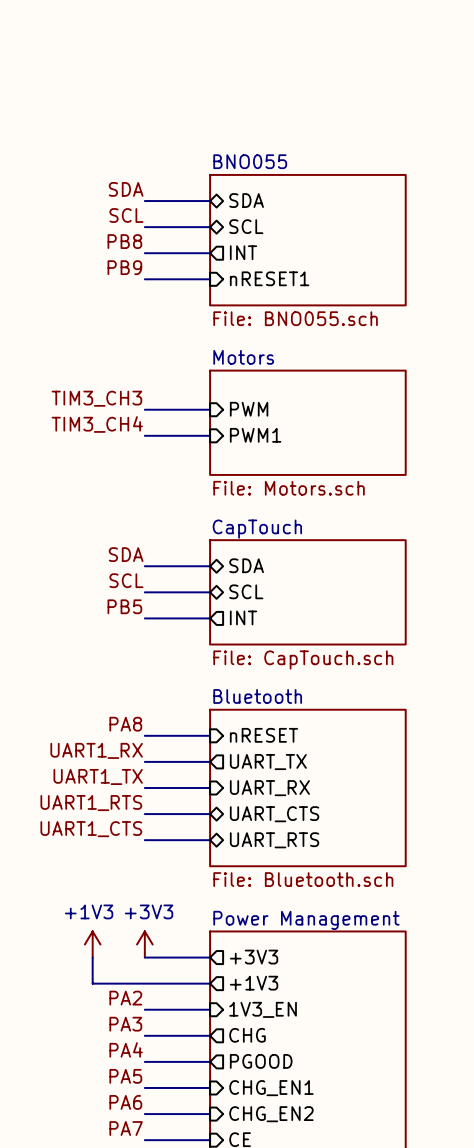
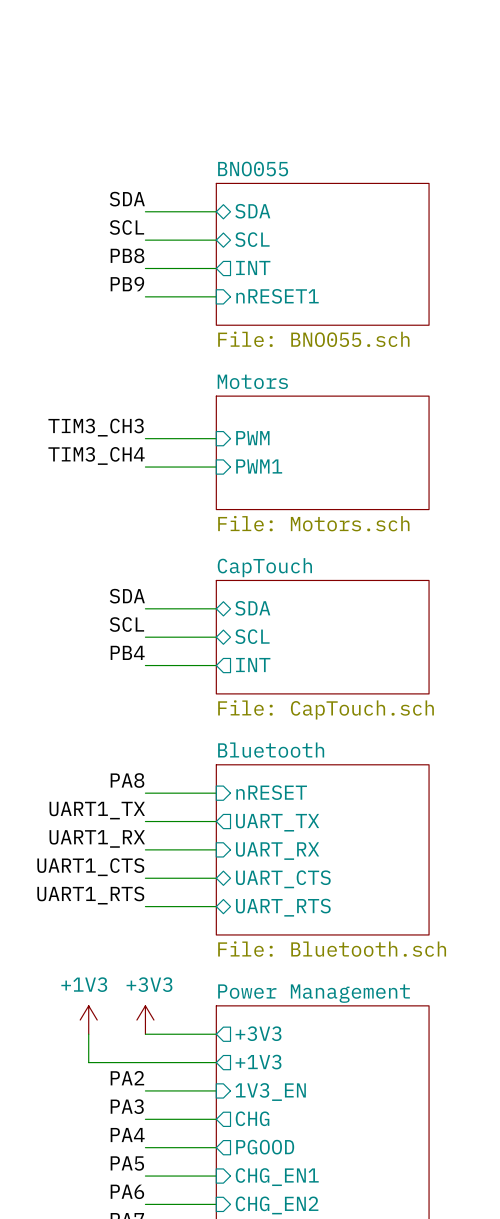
label: PB5 (124, 606) -> PB4 (127, 652)
label: UART1_RX (96, 750) -> UART1_TX (97, 810)
label: UART1_TX (98, 776) -> UART1_RX (97, 838)
label: UART1_RTS (91, 803) -> UART1_CTS (90, 867)
label: UART1_CTS (91, 829) -> UART1_RTS (90, 895)

